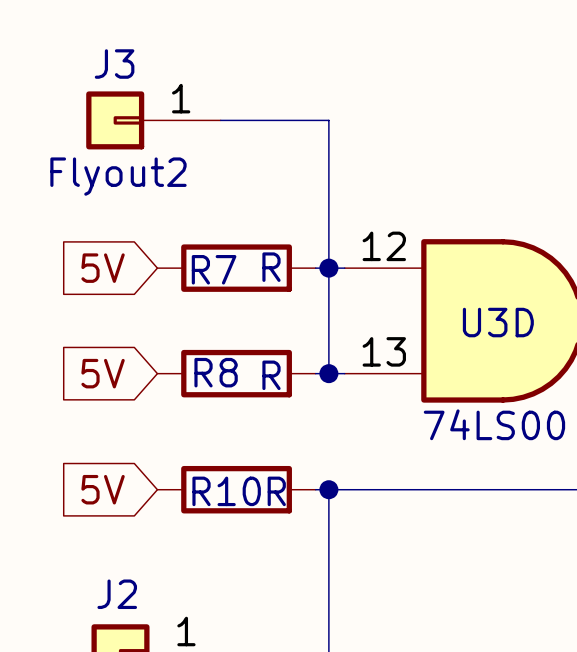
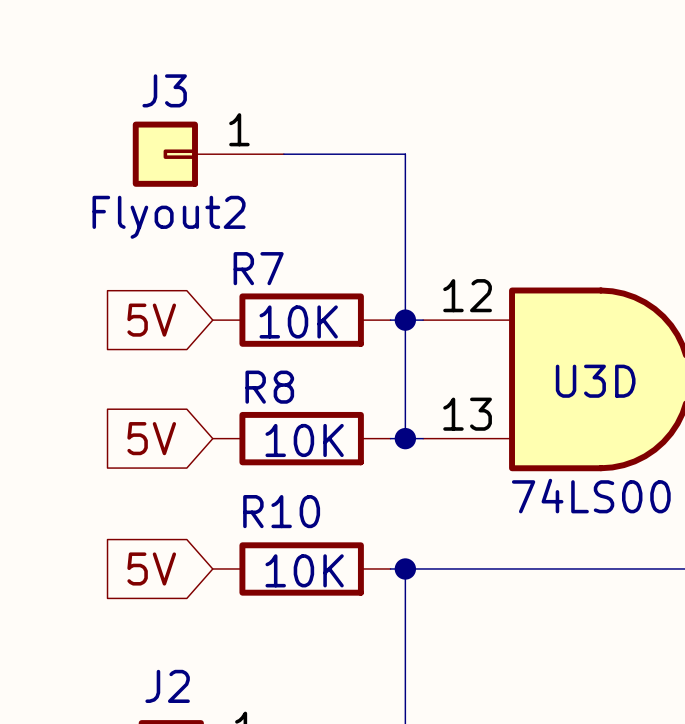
R7 value: R (271, 267) -> 10K (298, 321)
R7 name position: R7 (214, 269) -> R7 (258, 268)
R8 name position: R8 (216, 372) -> R8 (269, 387)
R8 value: R (271, 375) -> 10K (304, 440)
R10 name position: R10 (226, 491) -> R10 (281, 511)
R10 value: R (276, 491) -> 10K (304, 570)

